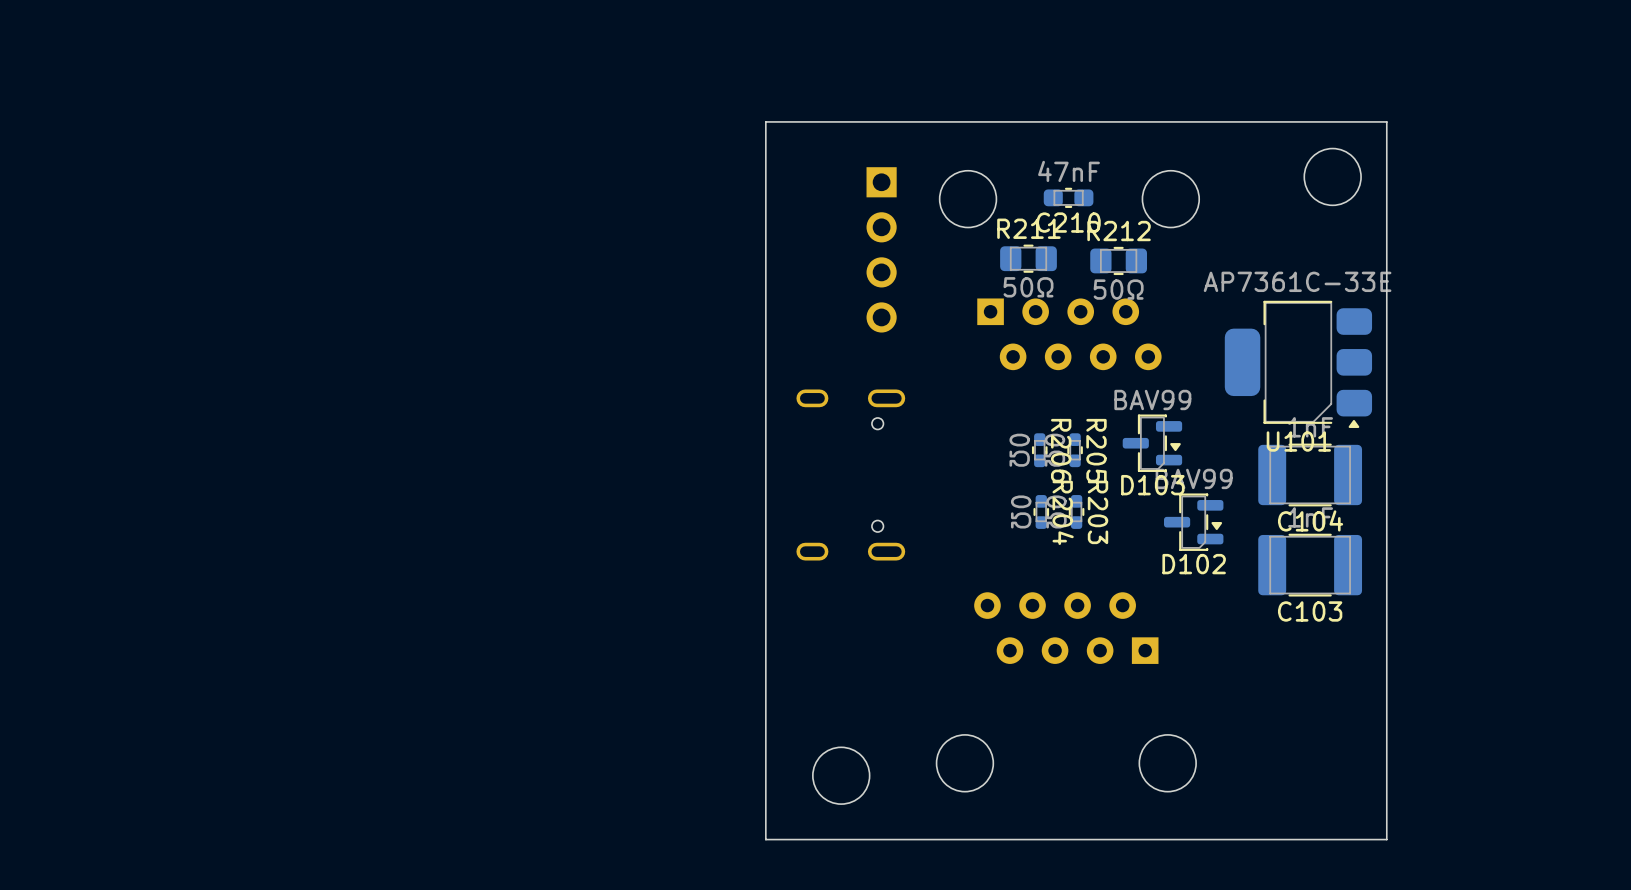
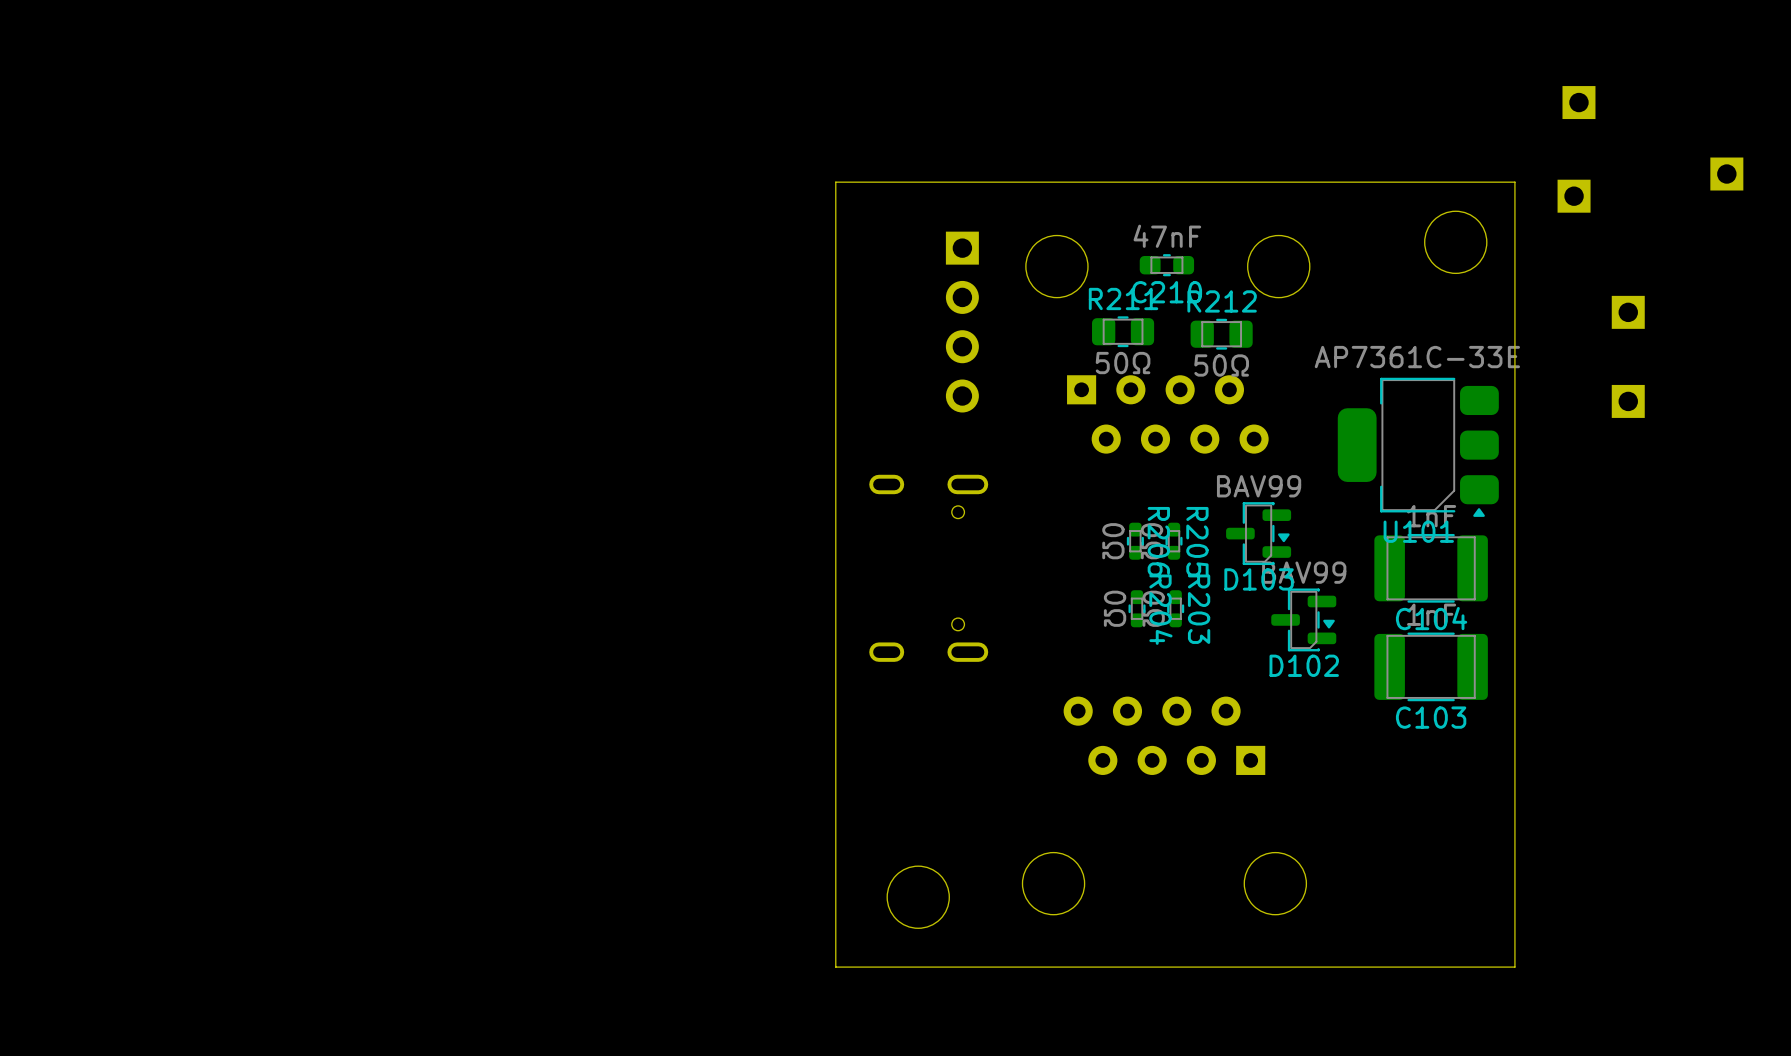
part: none -> (1578, 102)
part: none -> (1726, 174)
part: none -> (1574, 196)
part: none -> (1628, 312)
part: none -> (1628, 401)

